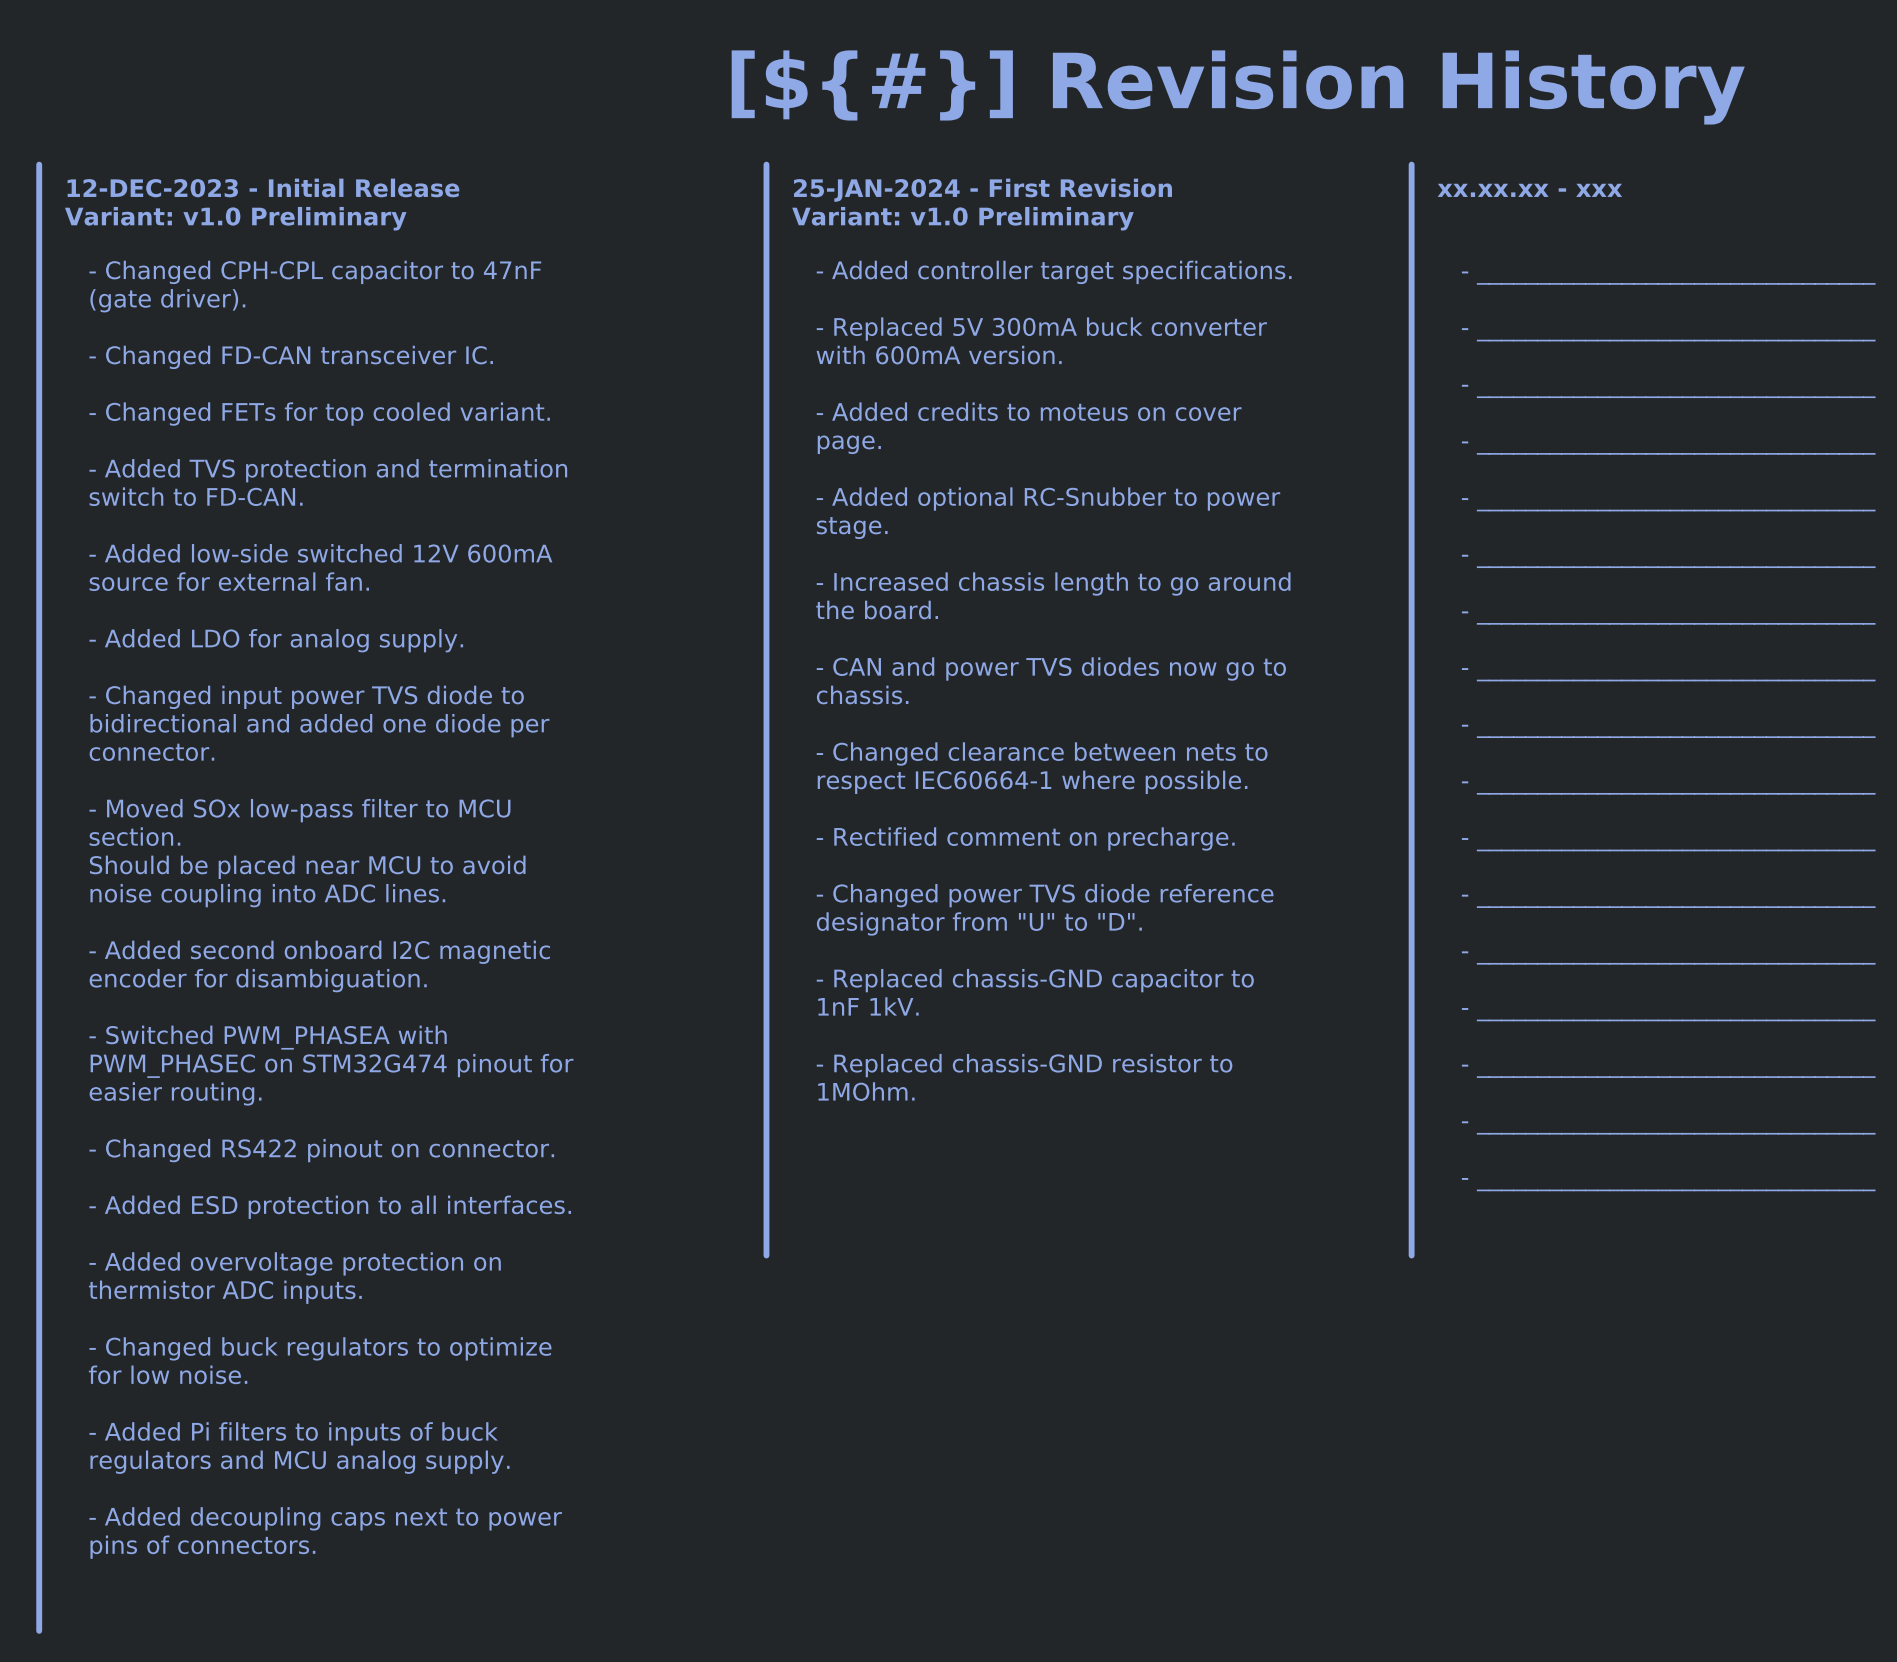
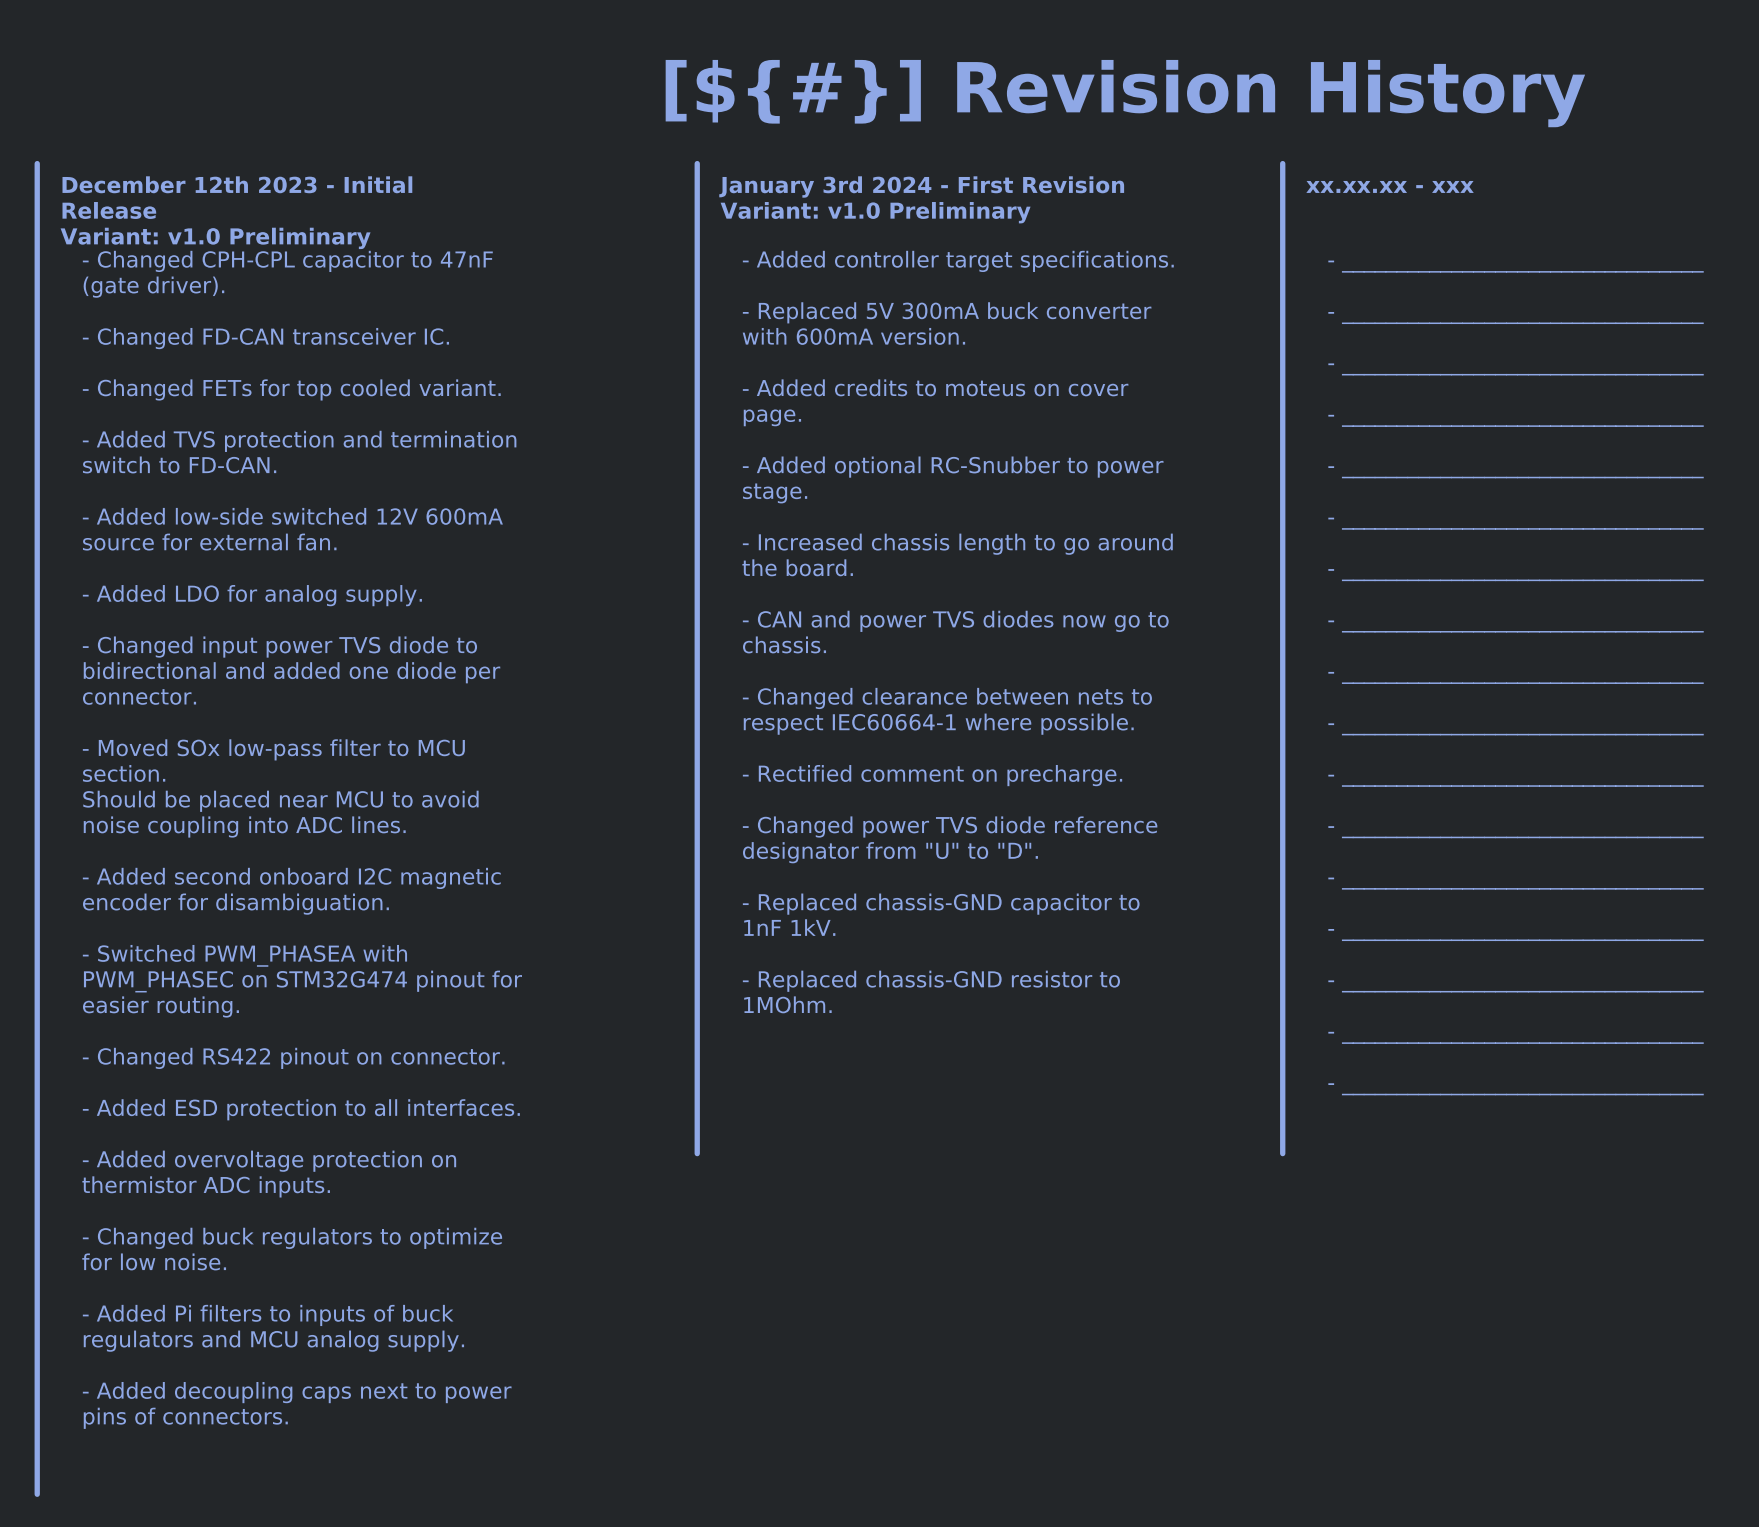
text: 12-DEC-2023 - Initial Release (263, 187) -> December 12th 2023 - Initial (237, 184)
text: 25-JAN-2024 - First Revision (983, 190) -> January 3rd 2024 - First Revision (921, 186)
text: Variant: v1.0 Preliminary (235, 218) -> Release (109, 210)
text: none -> Variant: v1.0 Preliminary (215, 238)

